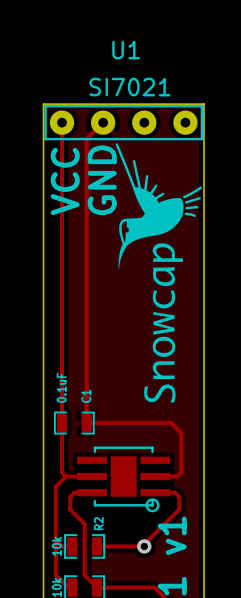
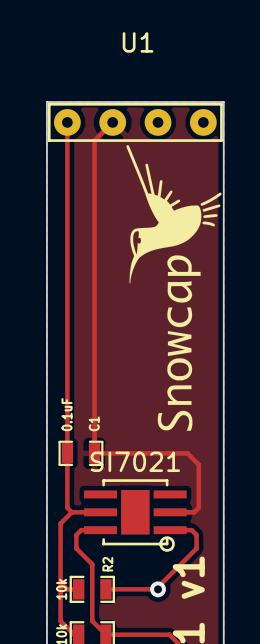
part value position: SI7021 (129, 87) -> SI7021 (135, 461)
text: GND (102, 180) -> none
text: VCC (65, 181) -> none

